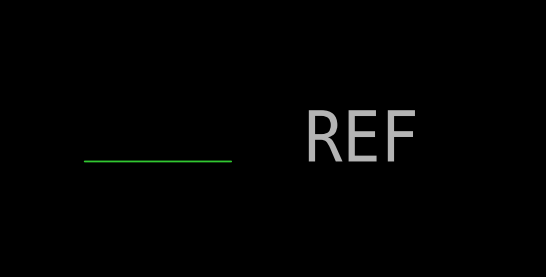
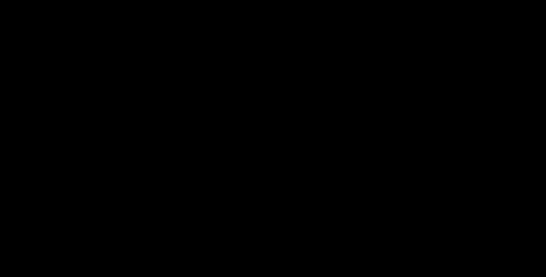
label: REF (361, 135) -> none
wire: (84, 161) (231, 161) -> none

